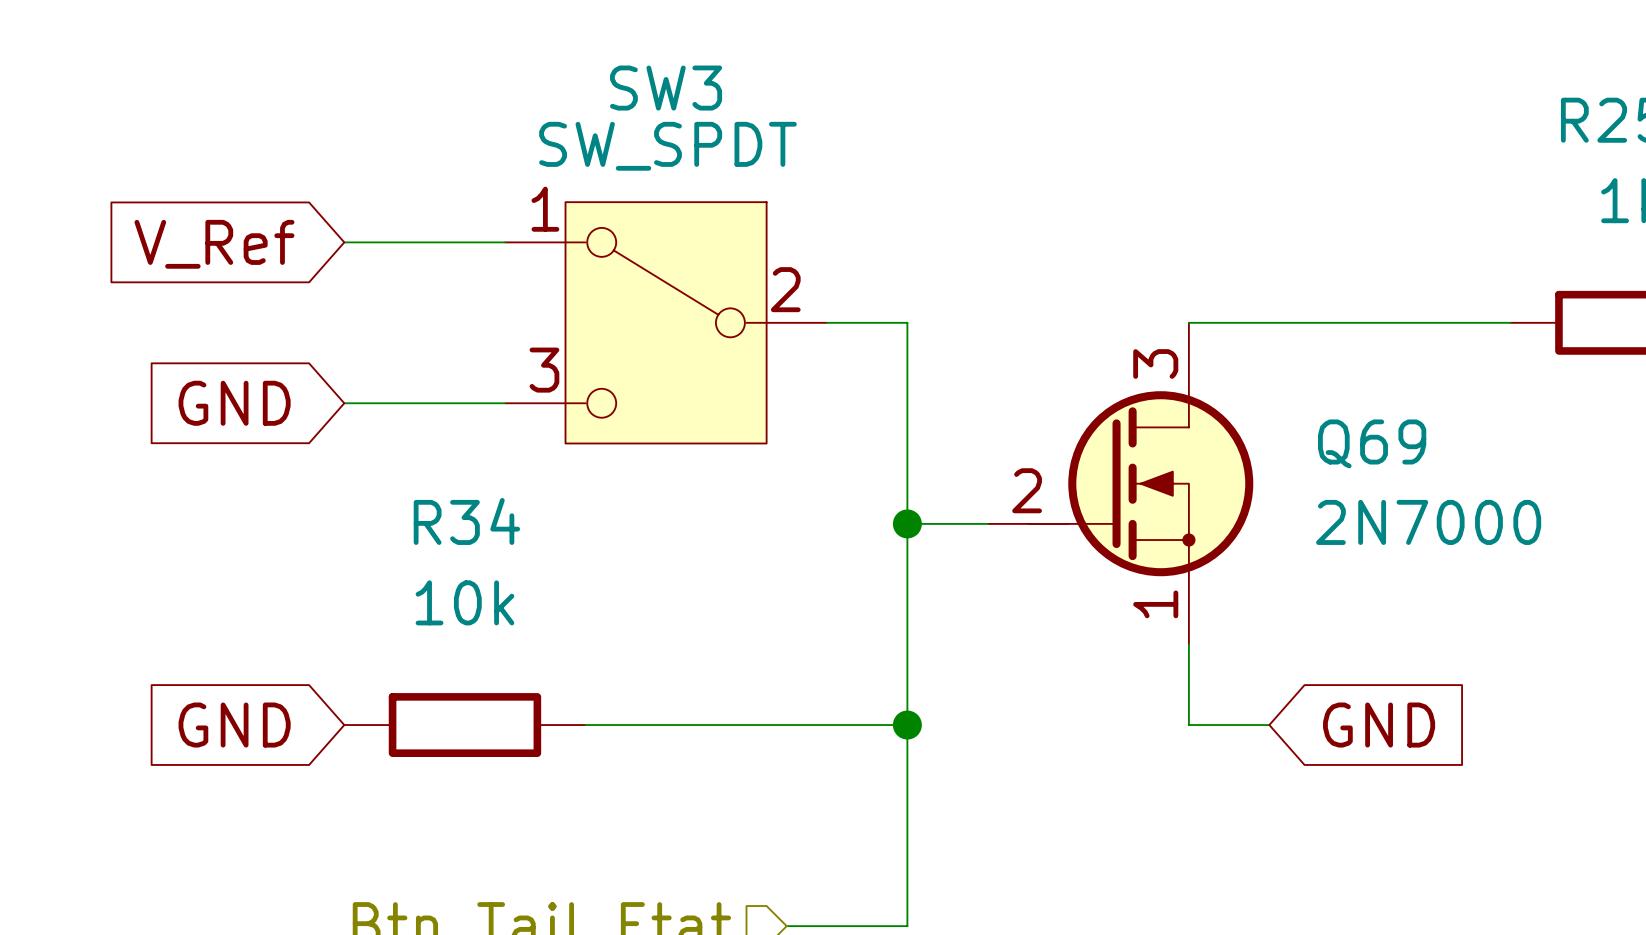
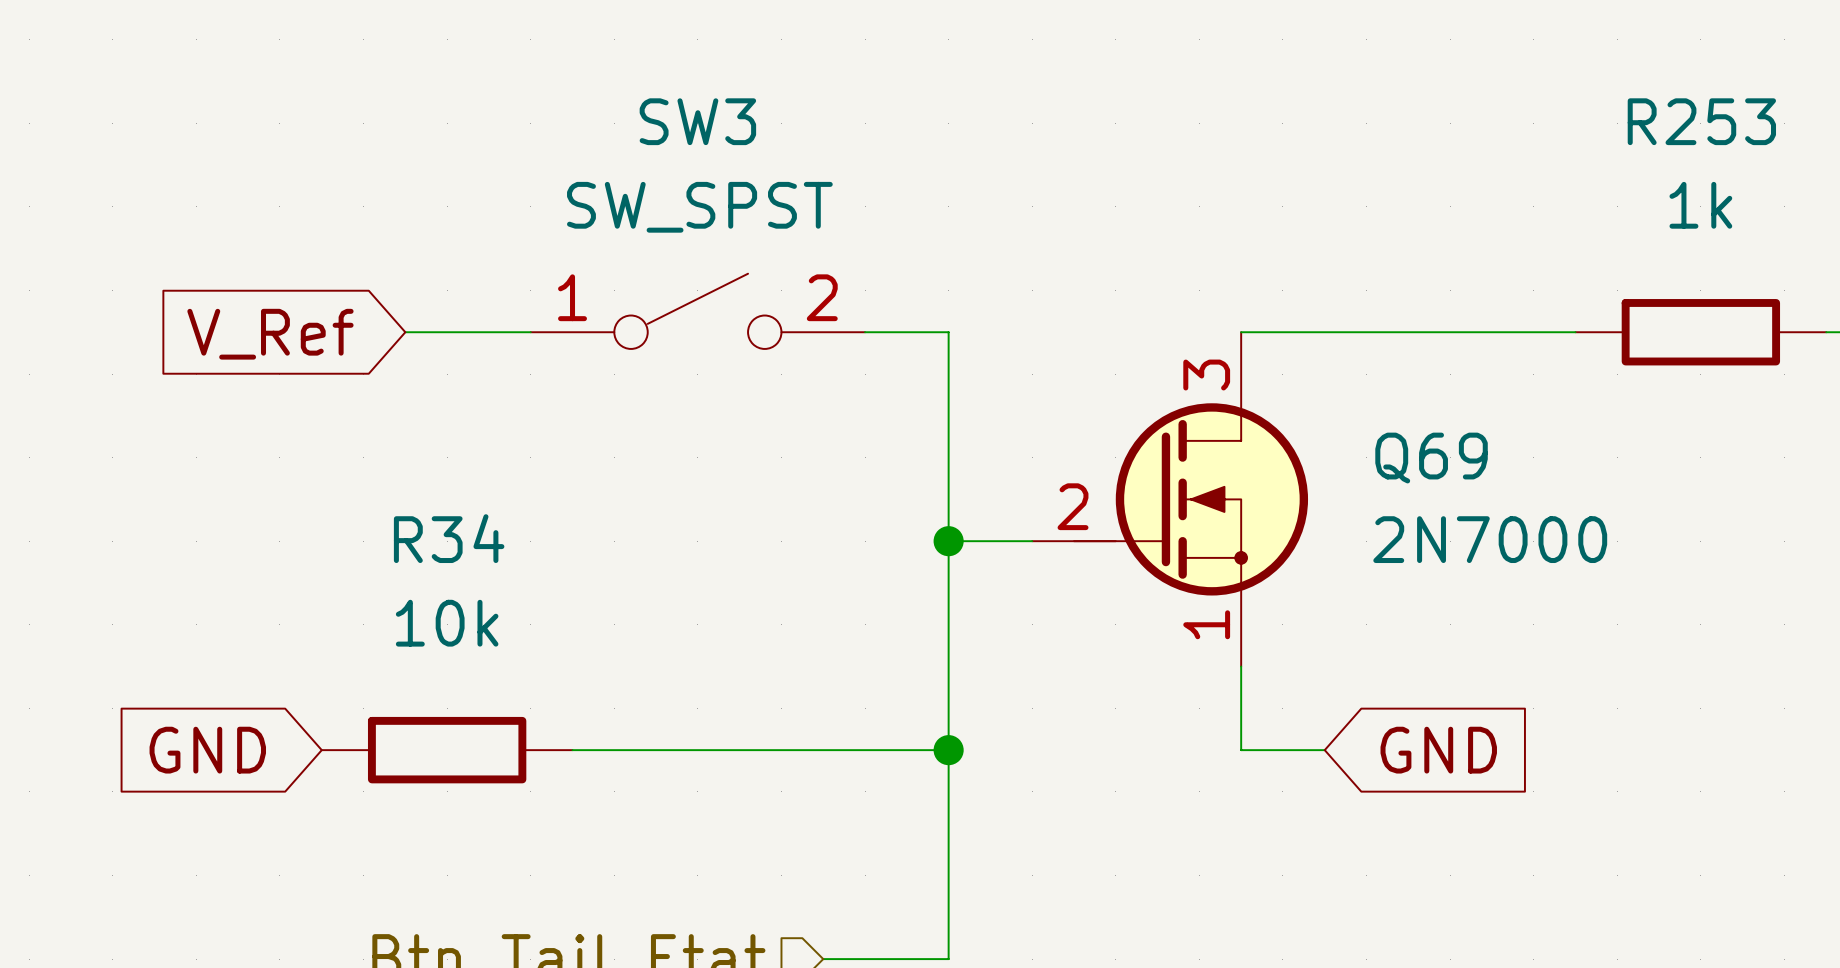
SW3 value: SW_SPDT (667, 146) -> SW_SPST (699, 207)
SW3 symbol: [505, 202, 827, 444] -> [530, 273, 866, 349]
wire: (344, 242) (505, 242) -> none
global label position: V_Ref (214, 244) -> V_Ref (270, 334)
wire: none -> (405, 332) (530, 332)
global label: GND (234, 403) -> none
wire: (344, 403) (505, 403) -> none
global label position: GND (234, 725) -> GND (207, 750)
R34 position: (464, 725) -> (447, 750)

